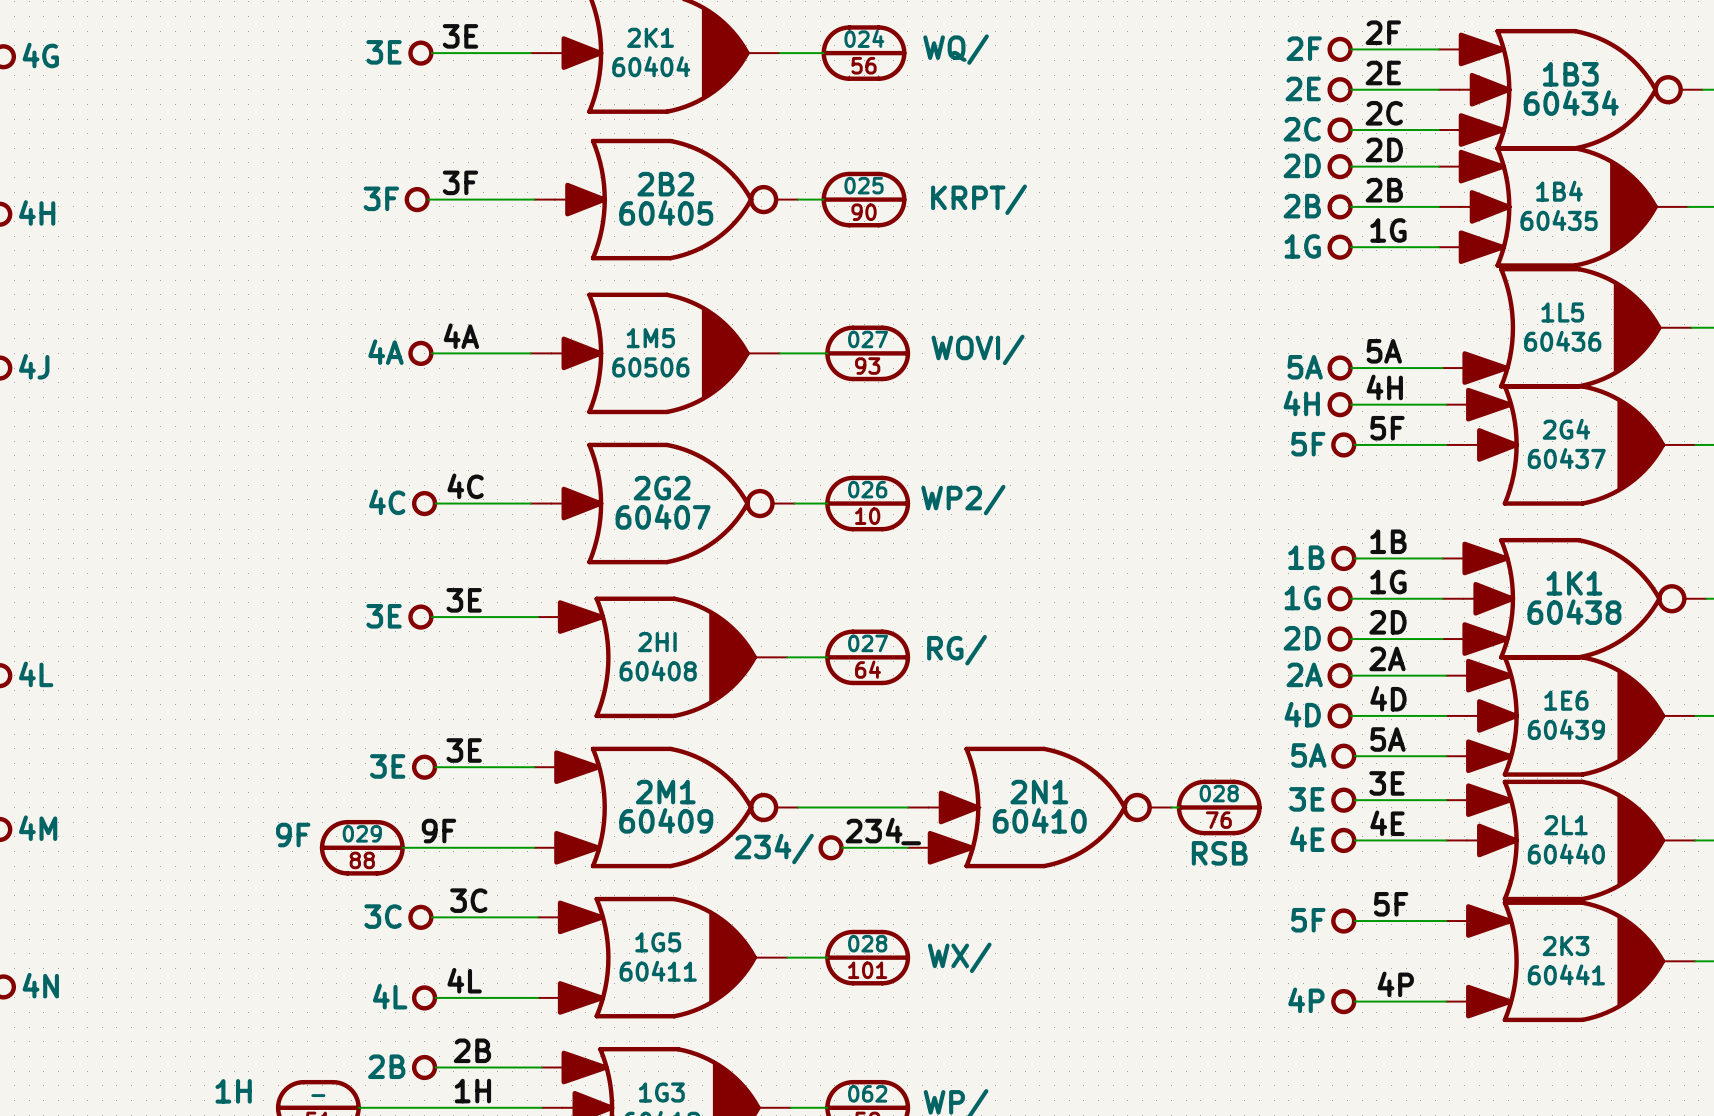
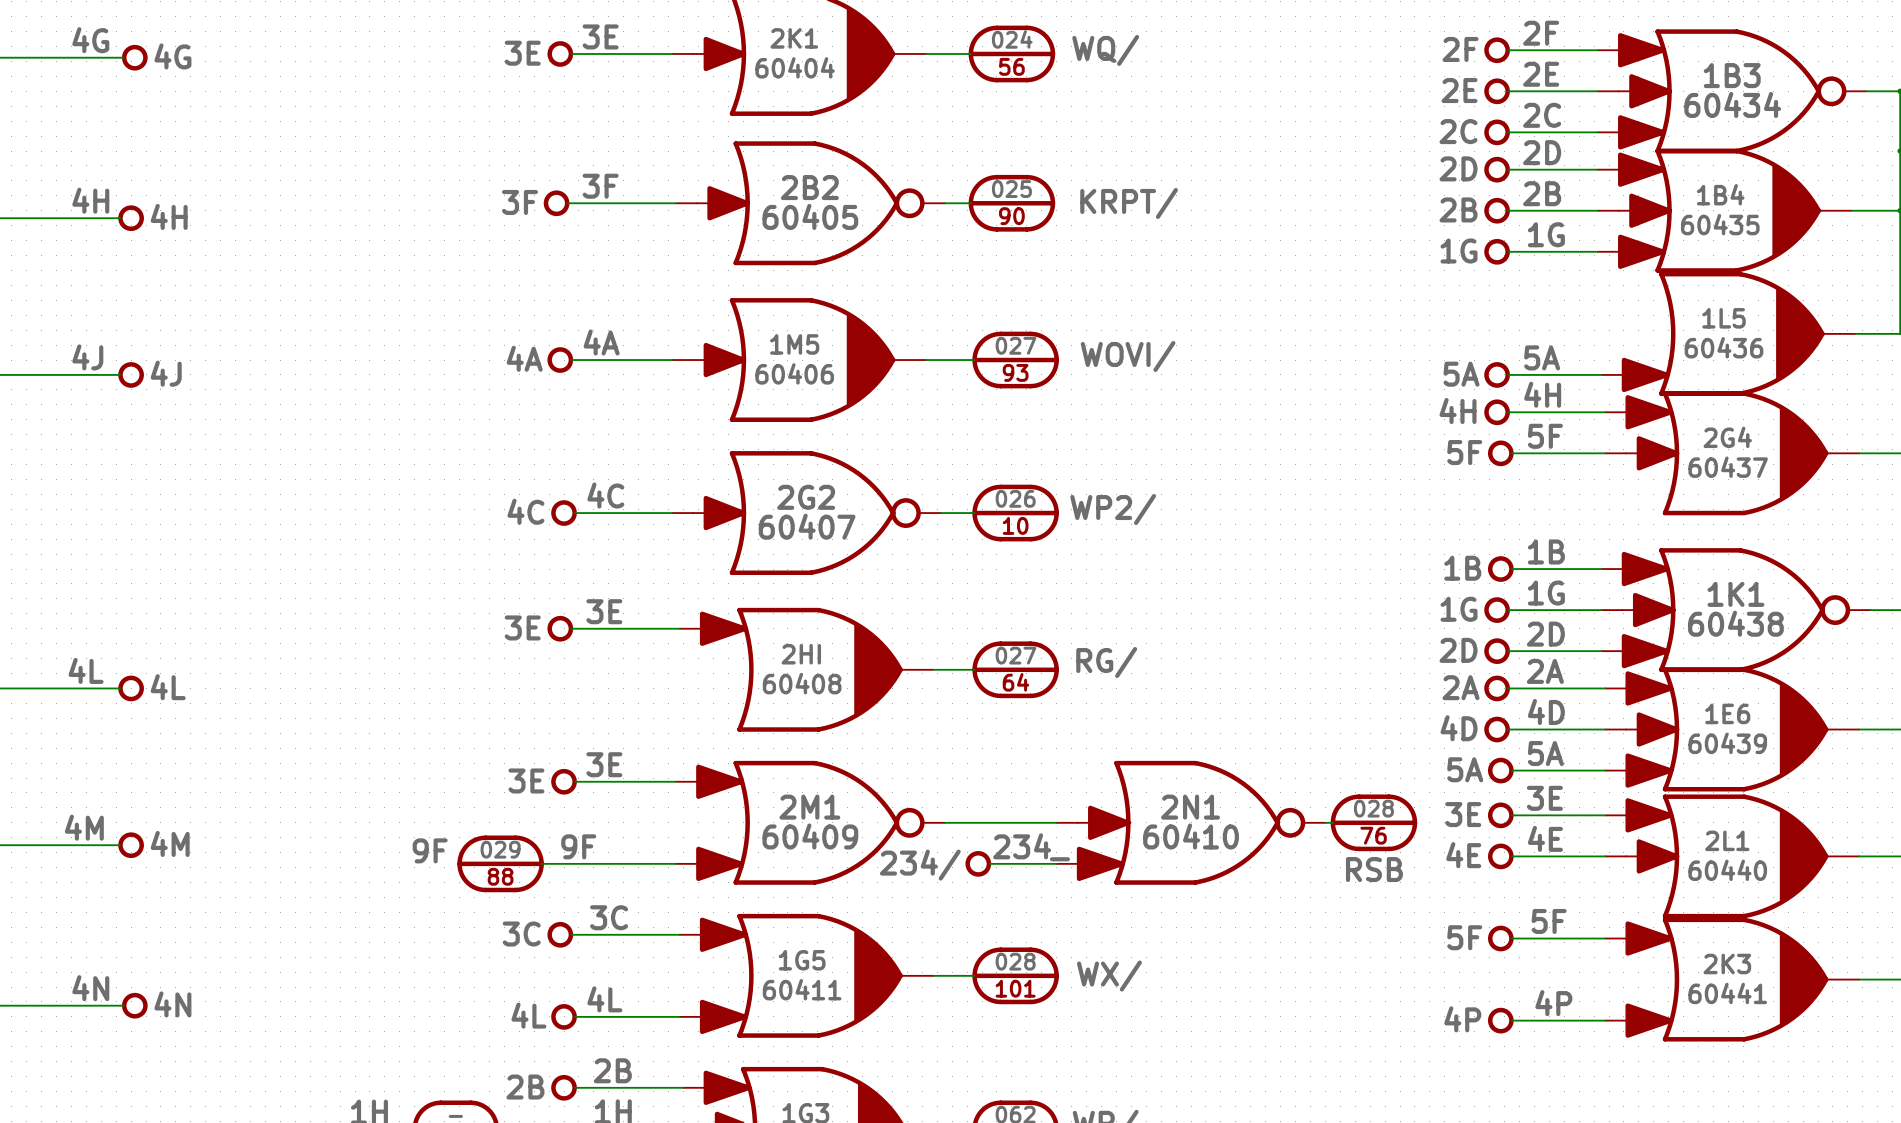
part text: 60506 (650, 367) -> 60406 (794, 373)

